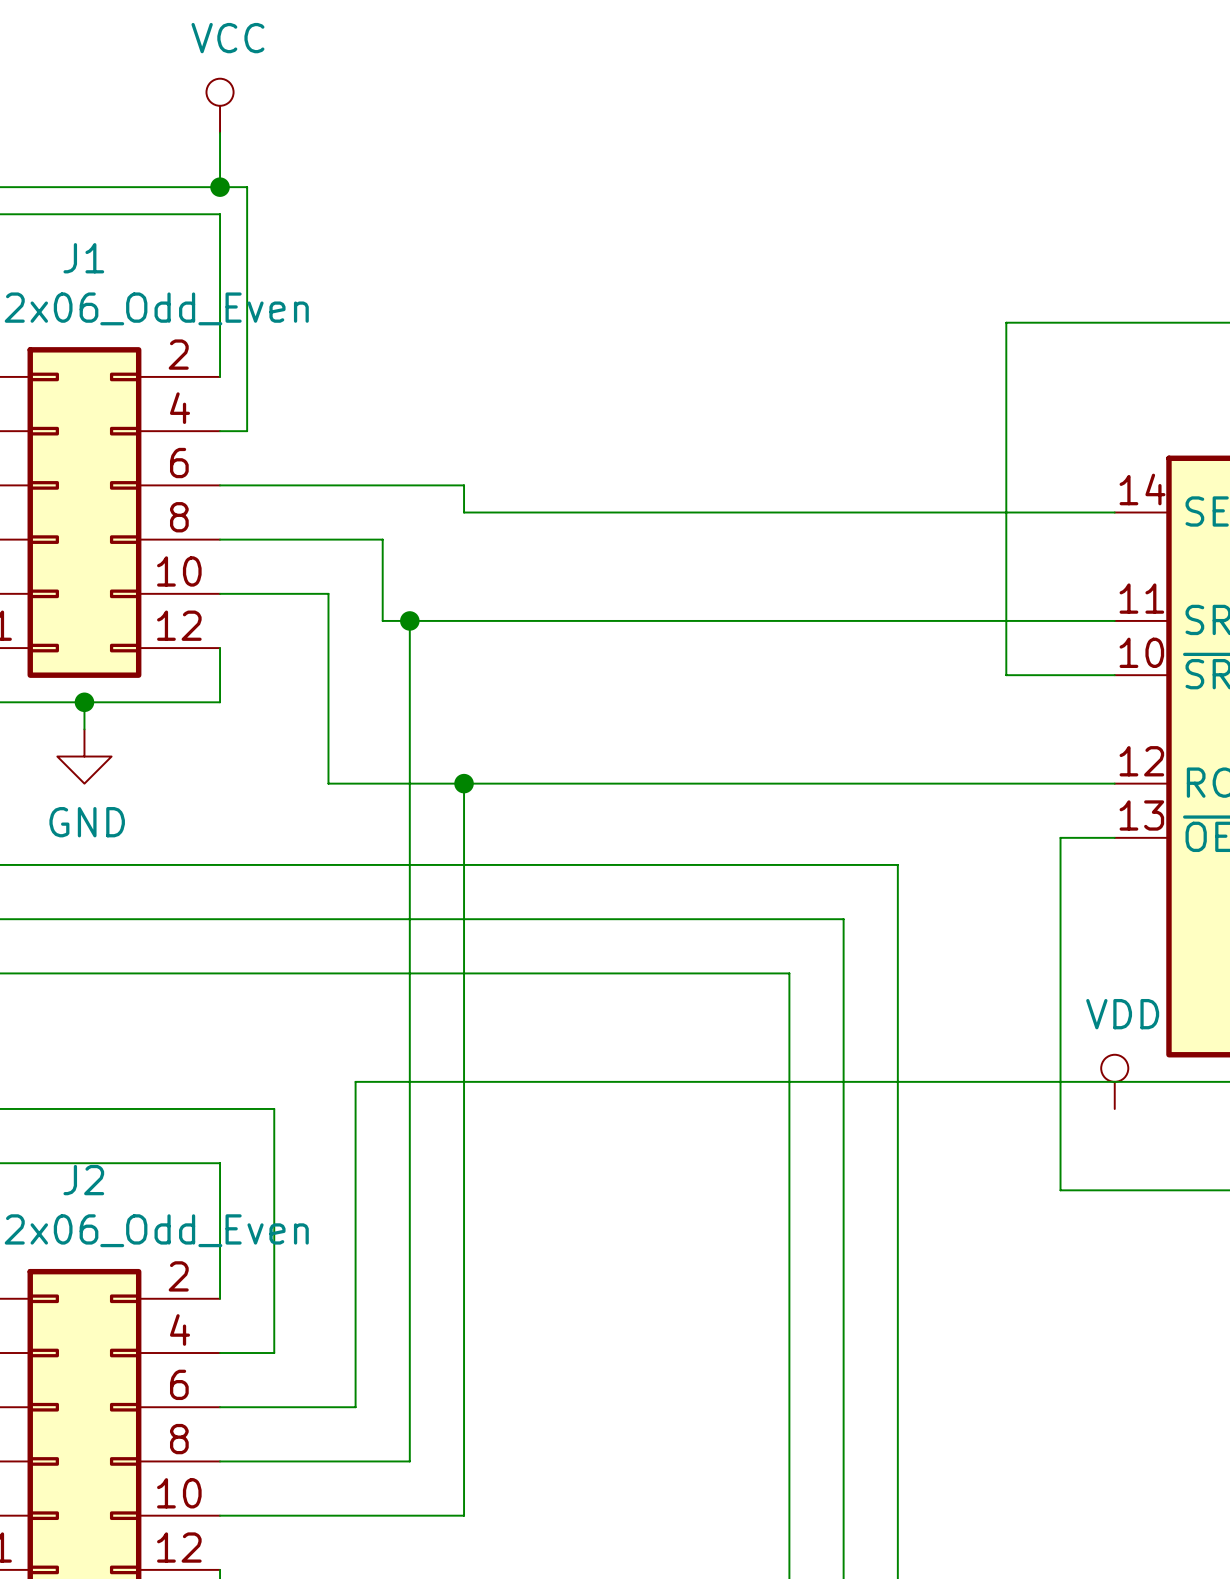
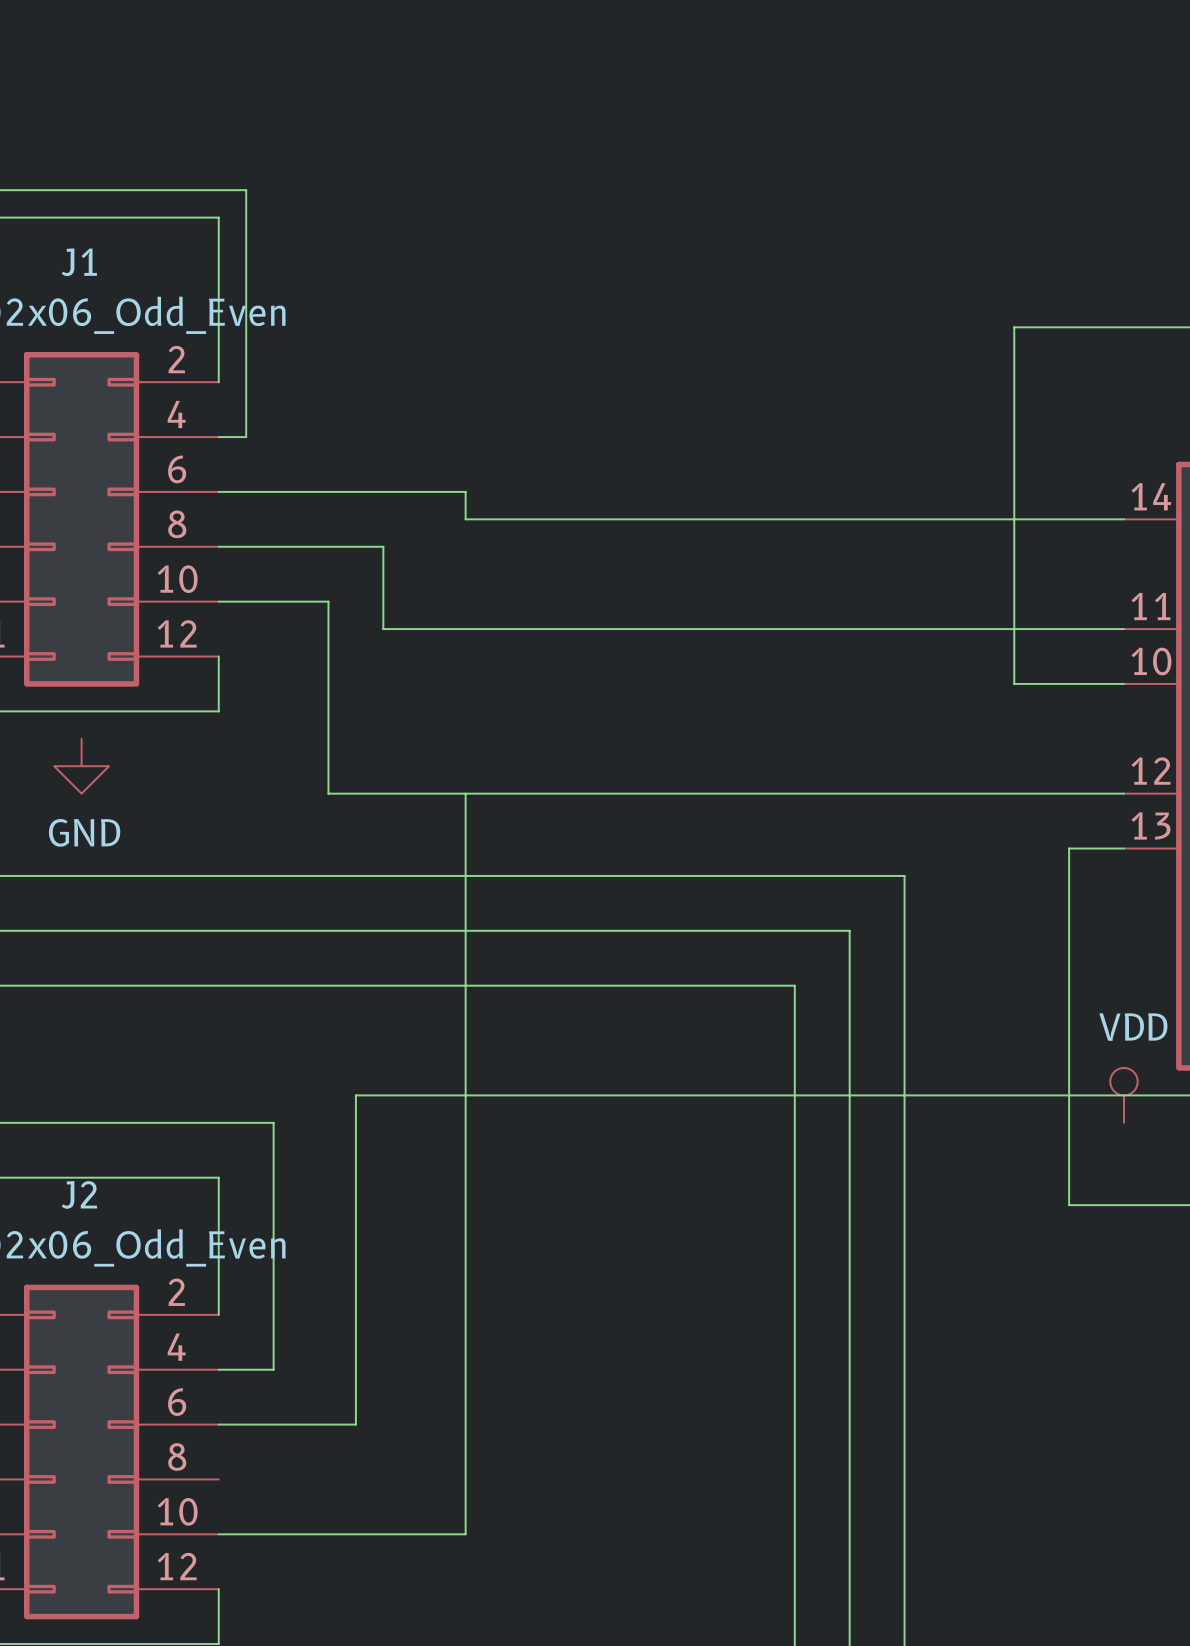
power symbol: VCC (220, 105) -> none
wire: (220, 132) (220, 187) -> none
junction: (220, 187) -> none
wire: (409, 620) (409, 1461) (220, 1461) -> none
junction: (409, 620) -> none
wire: (84, 702) (84, 729) -> none
junction: (84, 702) -> none
junction: (464, 783) -> none

